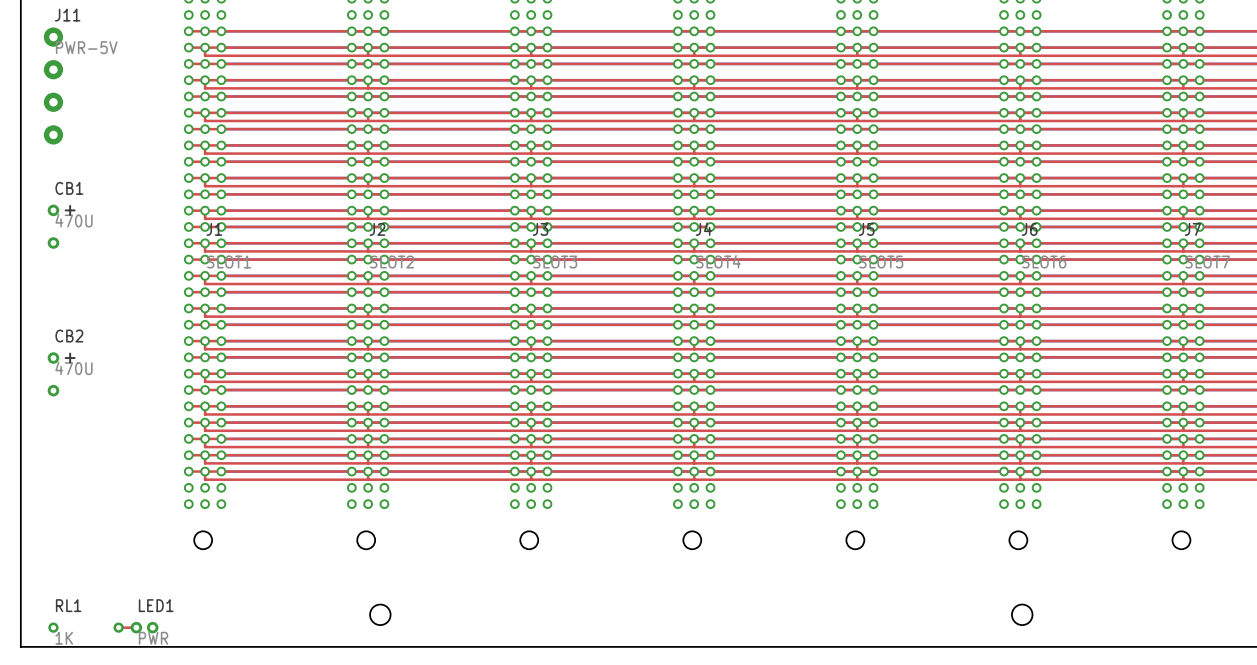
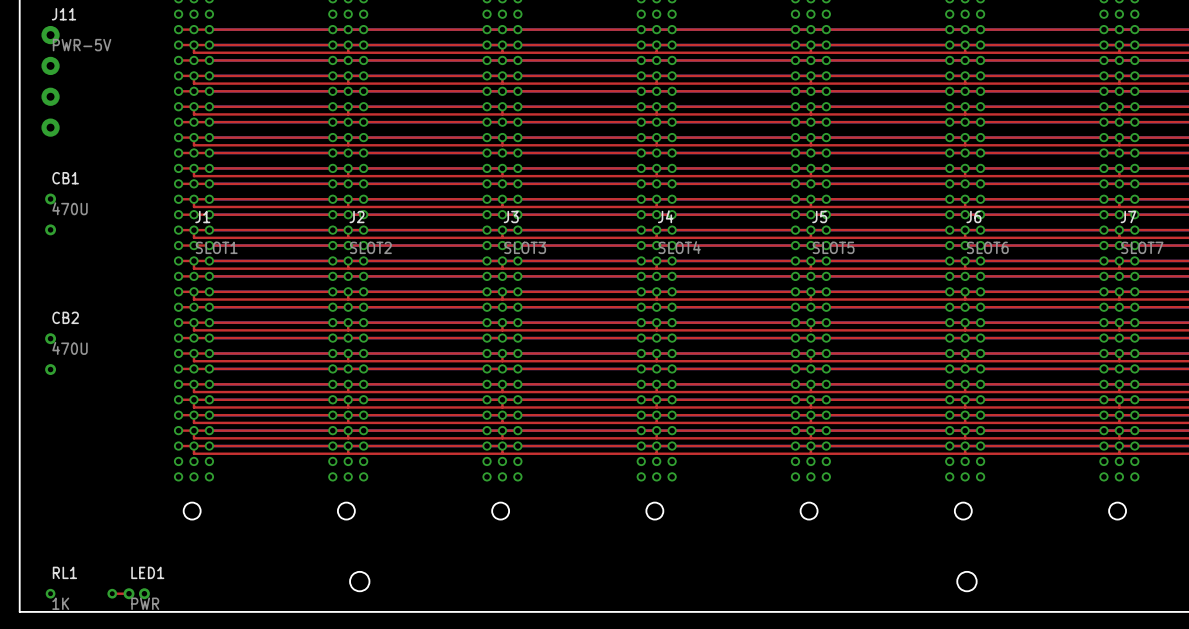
CB1 footprint: [47, 204, 76, 249] -> [45, 193, 57, 236]
CB2 footprint: [47, 352, 76, 397] -> [45, 333, 57, 375]

